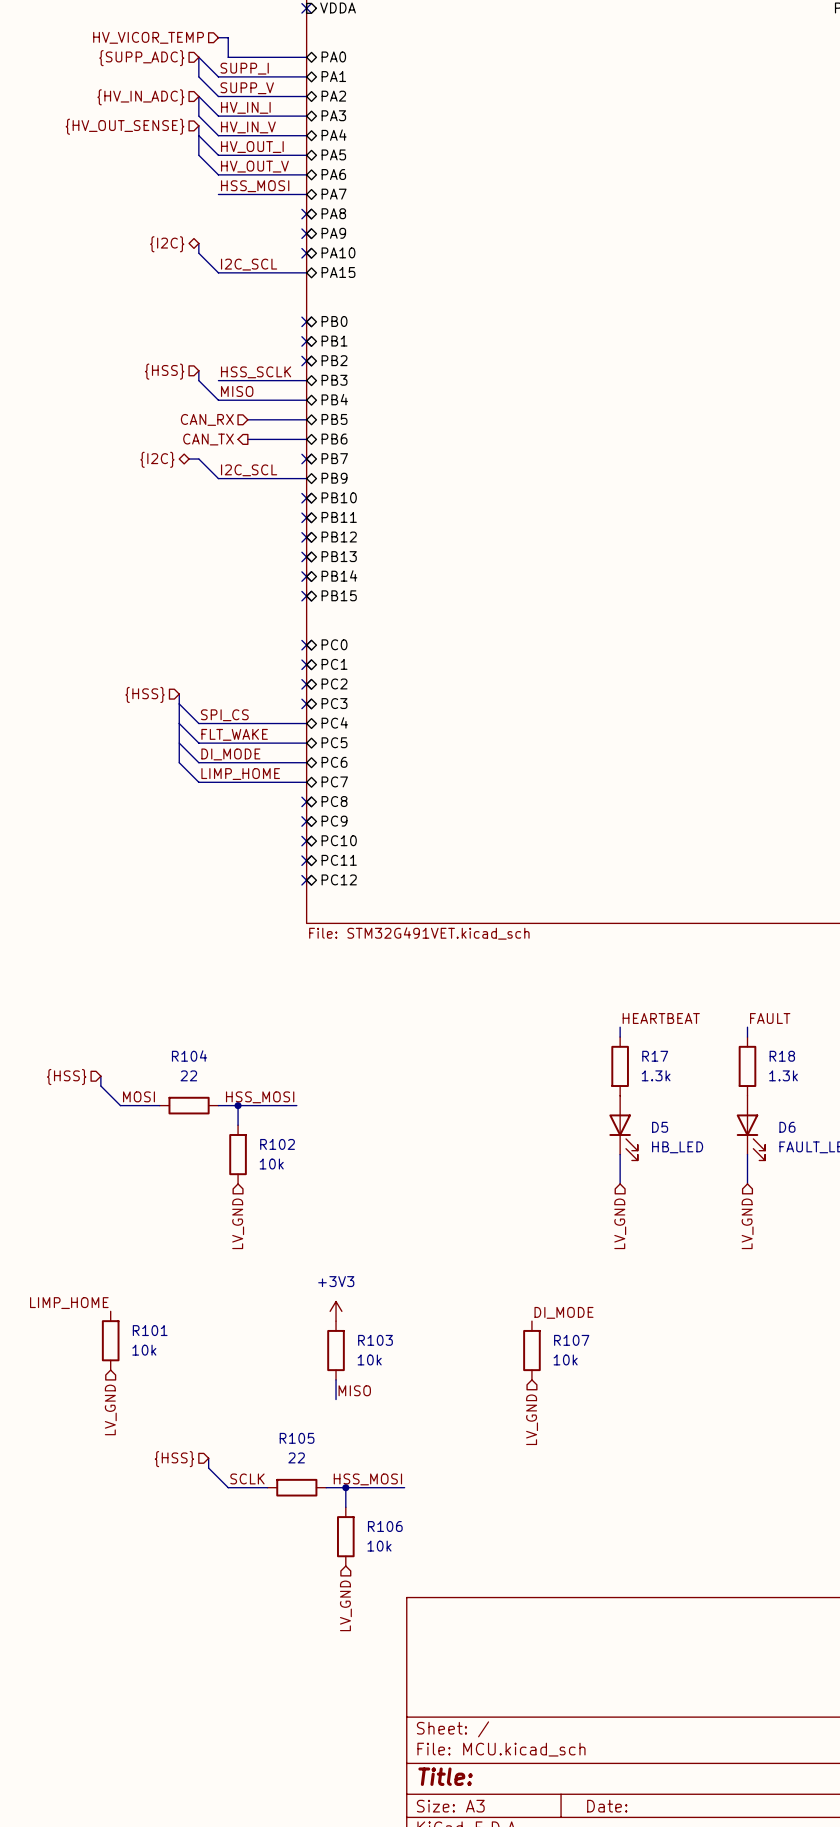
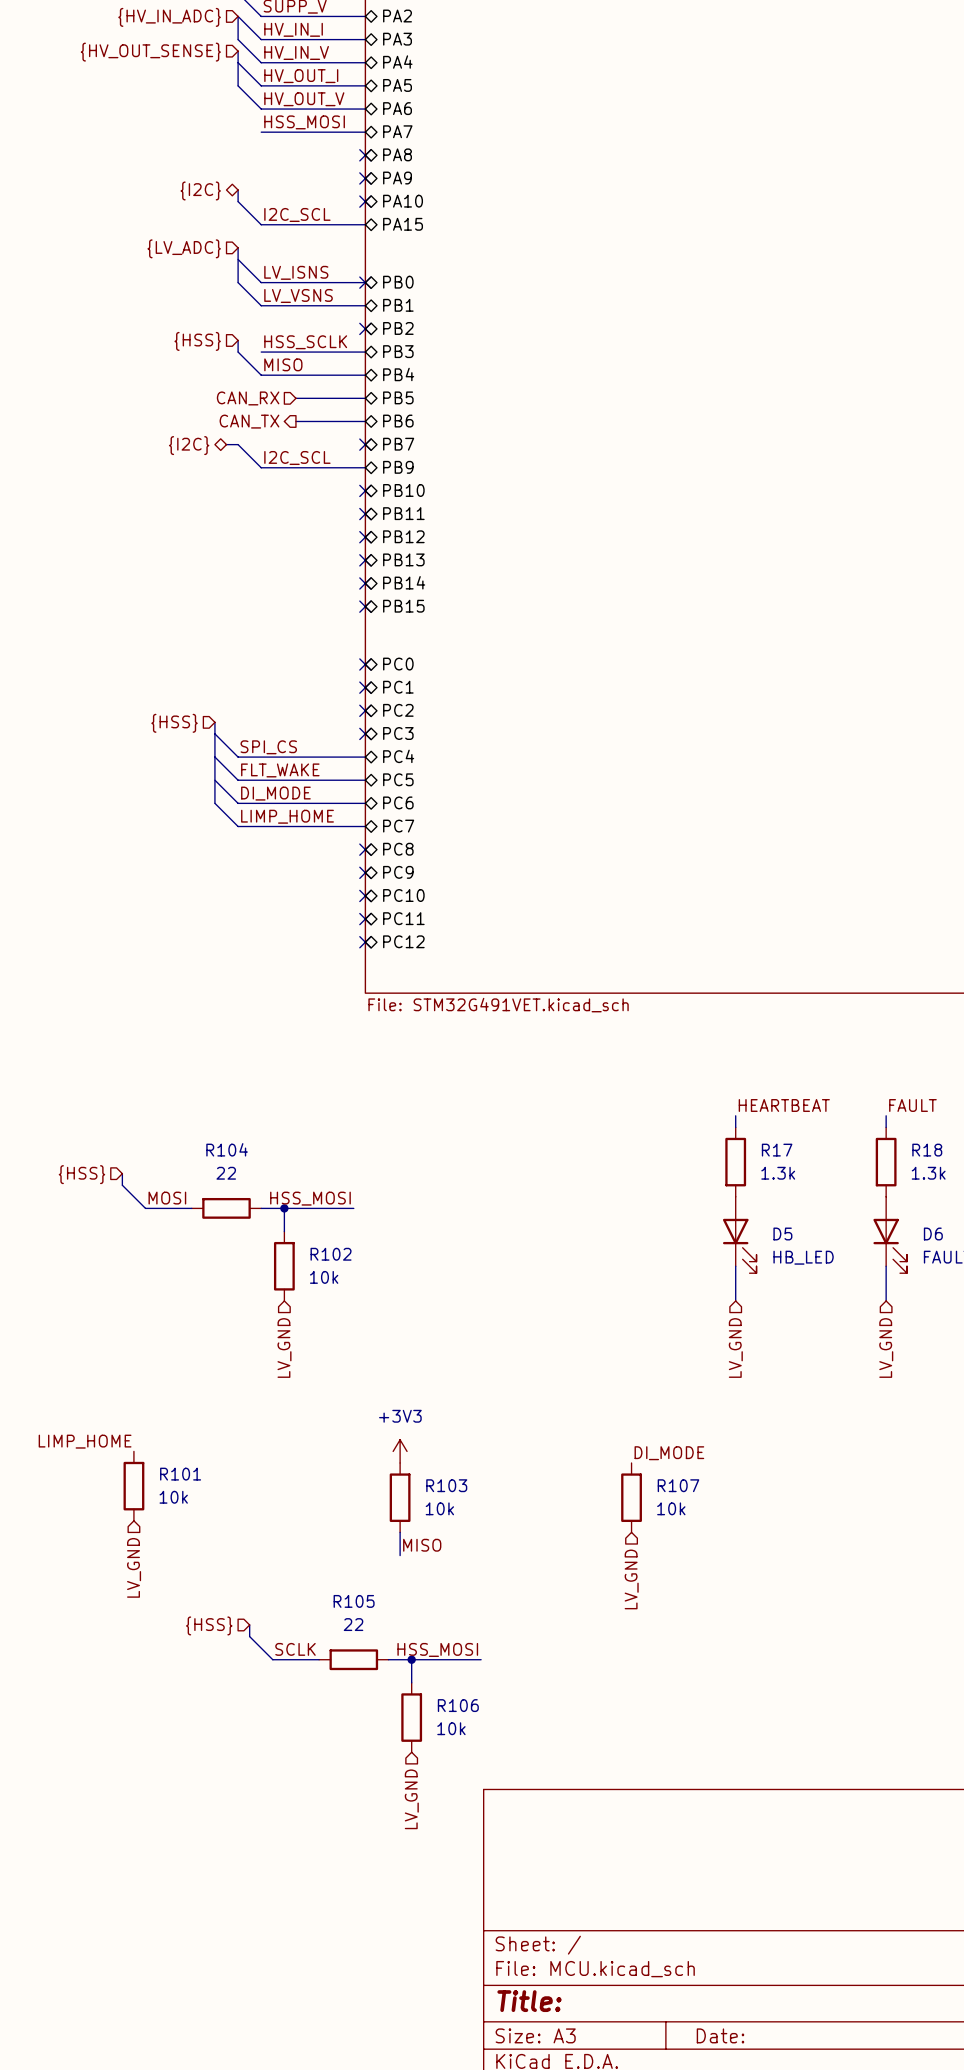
bus: none -> (238, 247) (238, 282)
hierarchical label: none -> {LV_ADC} (184, 248)
wire: none -> (238, 259) (261, 282) (365, 282)
label: none -> LV_ISNS (296, 272)
wire: none -> (238, 282) (261, 305) (365, 305)
label: none -> LV_VSNS (298, 295)
no-connect mark: (306, 341) -> none

